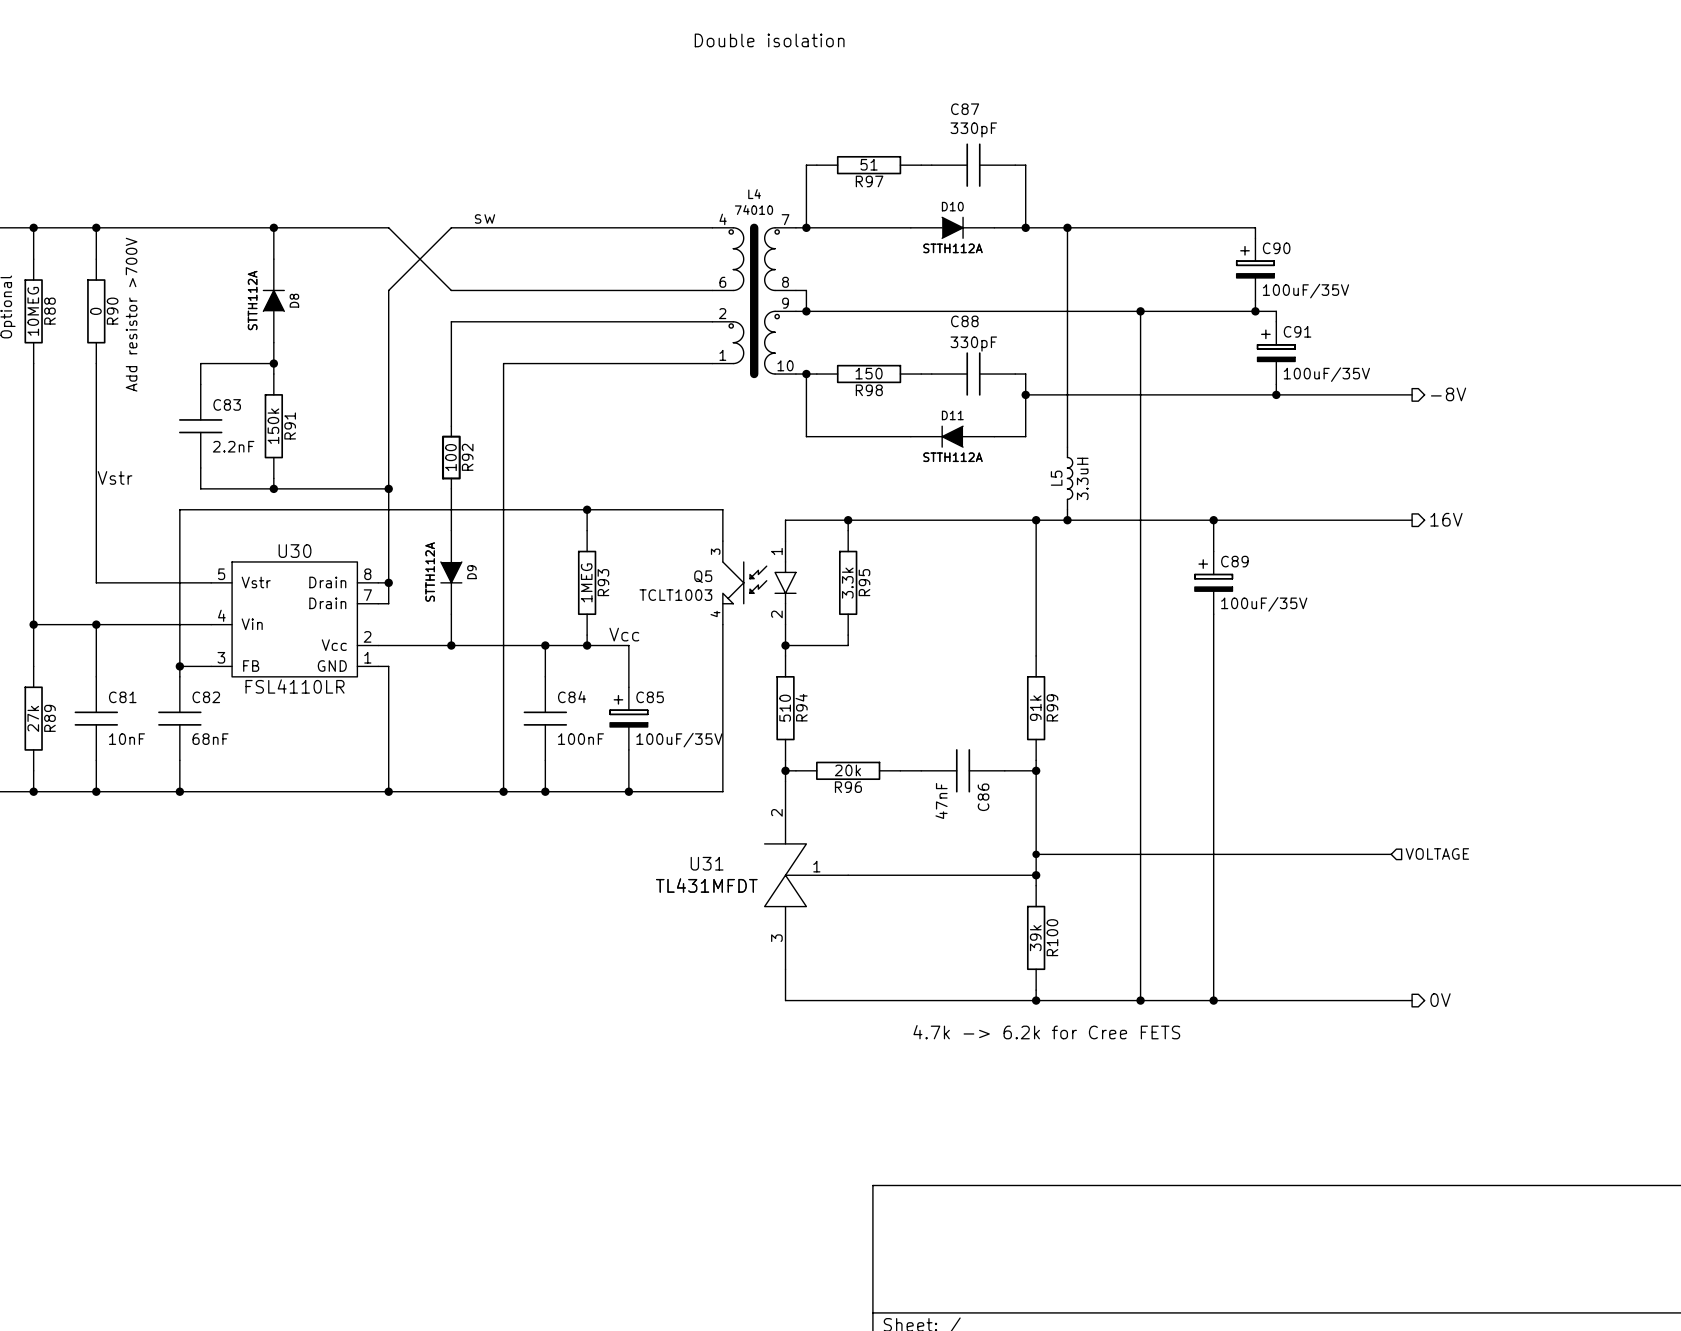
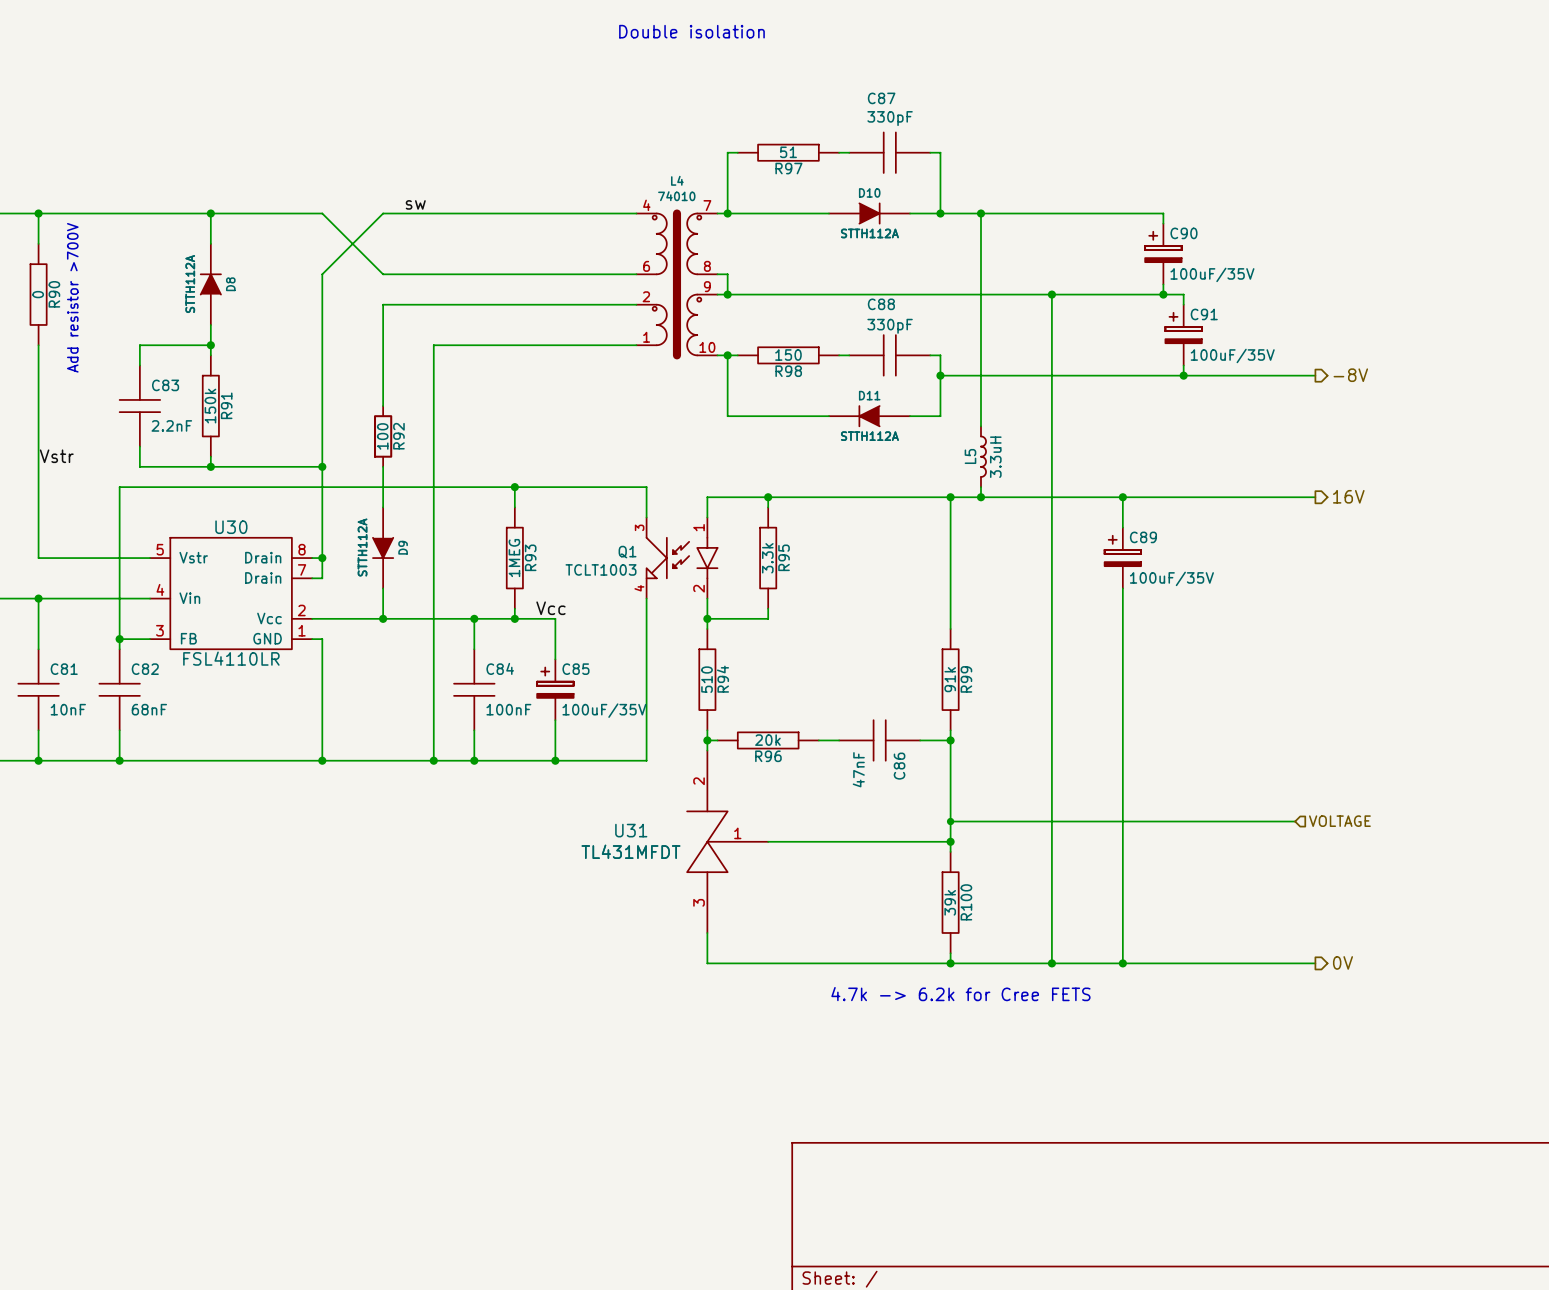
Q5 name: Q5 (703, 576) -> Q1 (627, 552)

